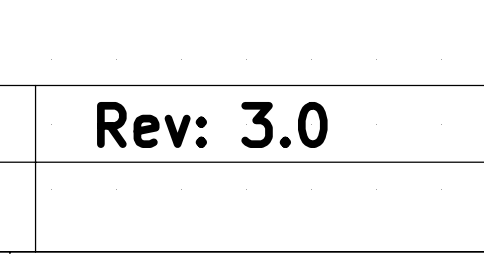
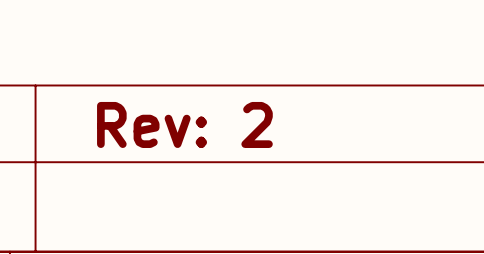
title block: Rev: 3.0 (212, 124) -> Rev: 2 (184, 124)

